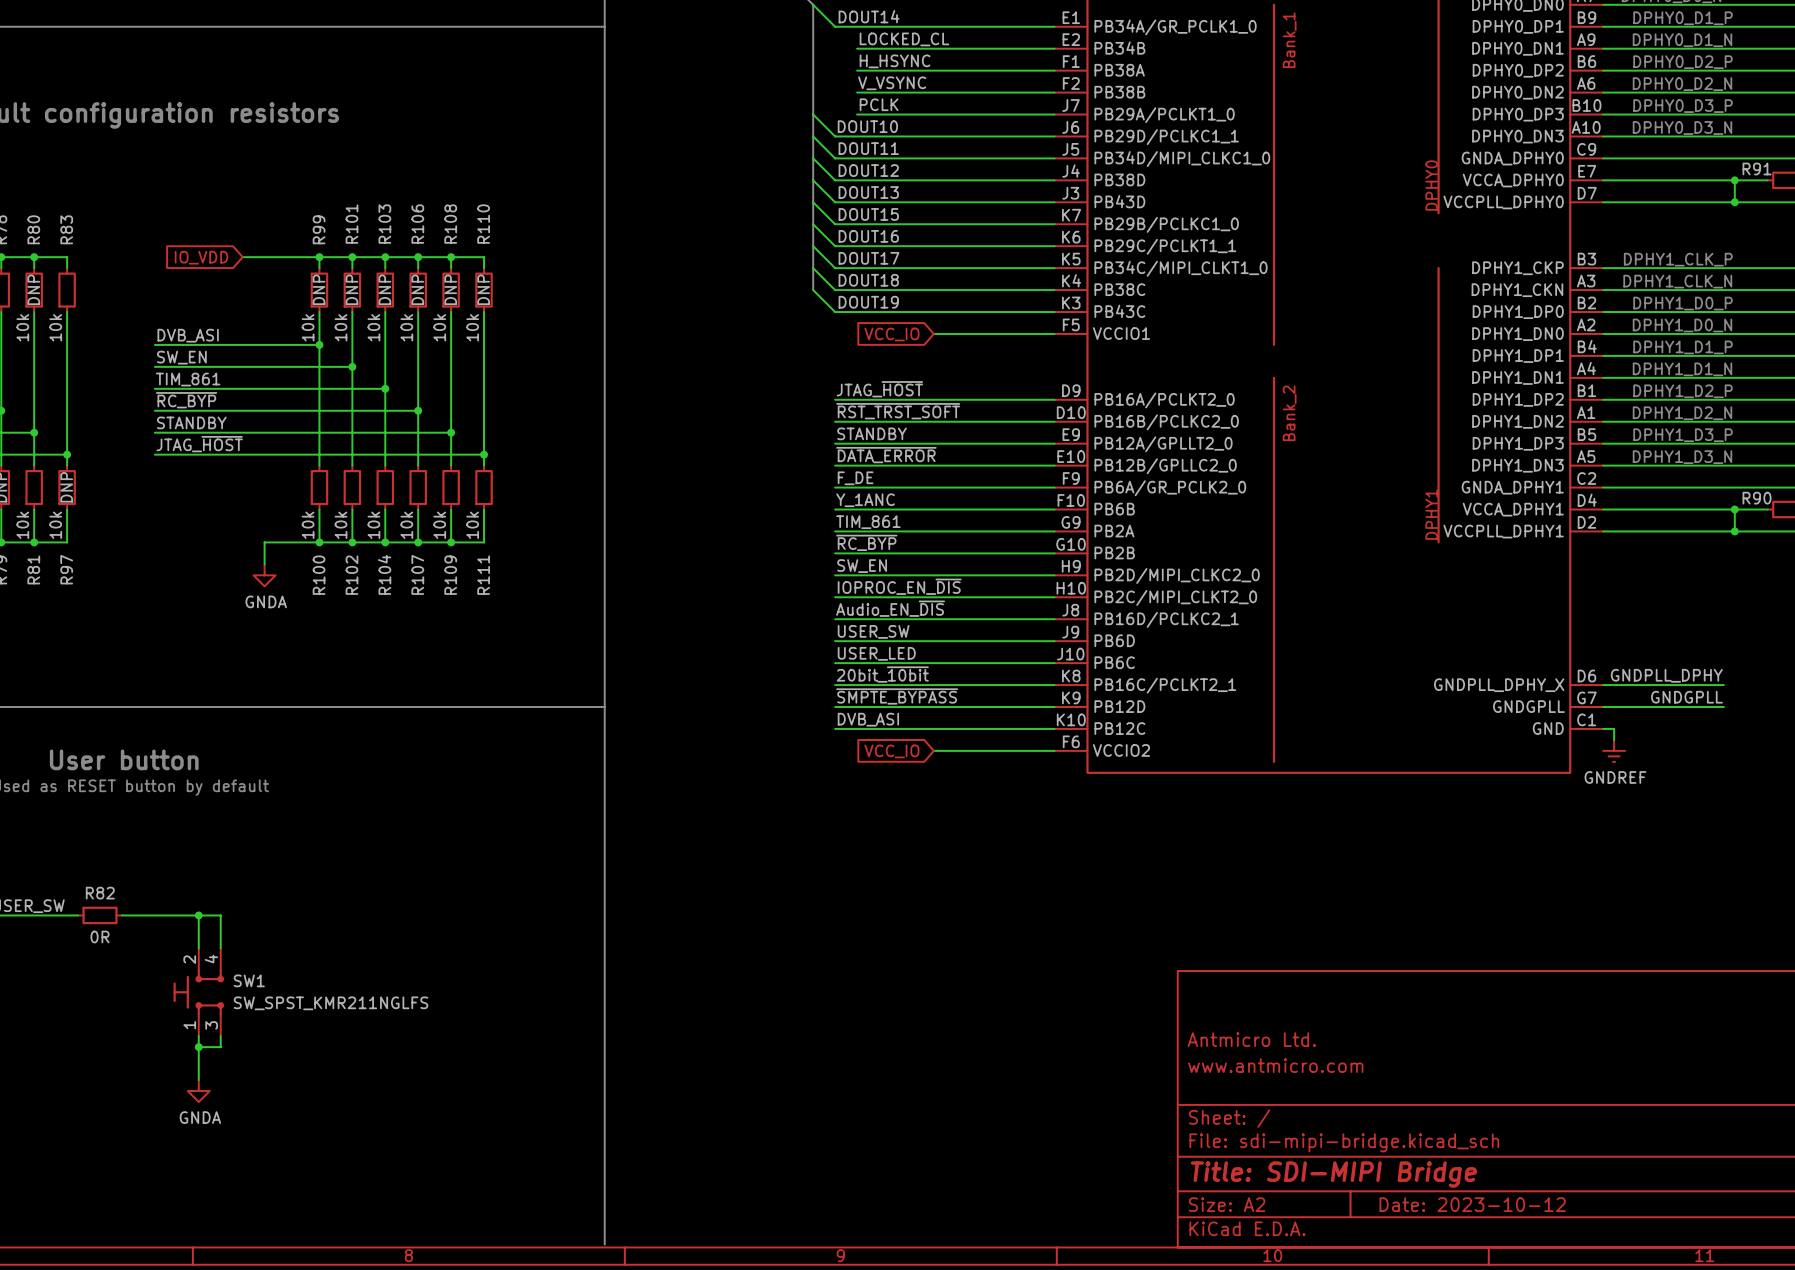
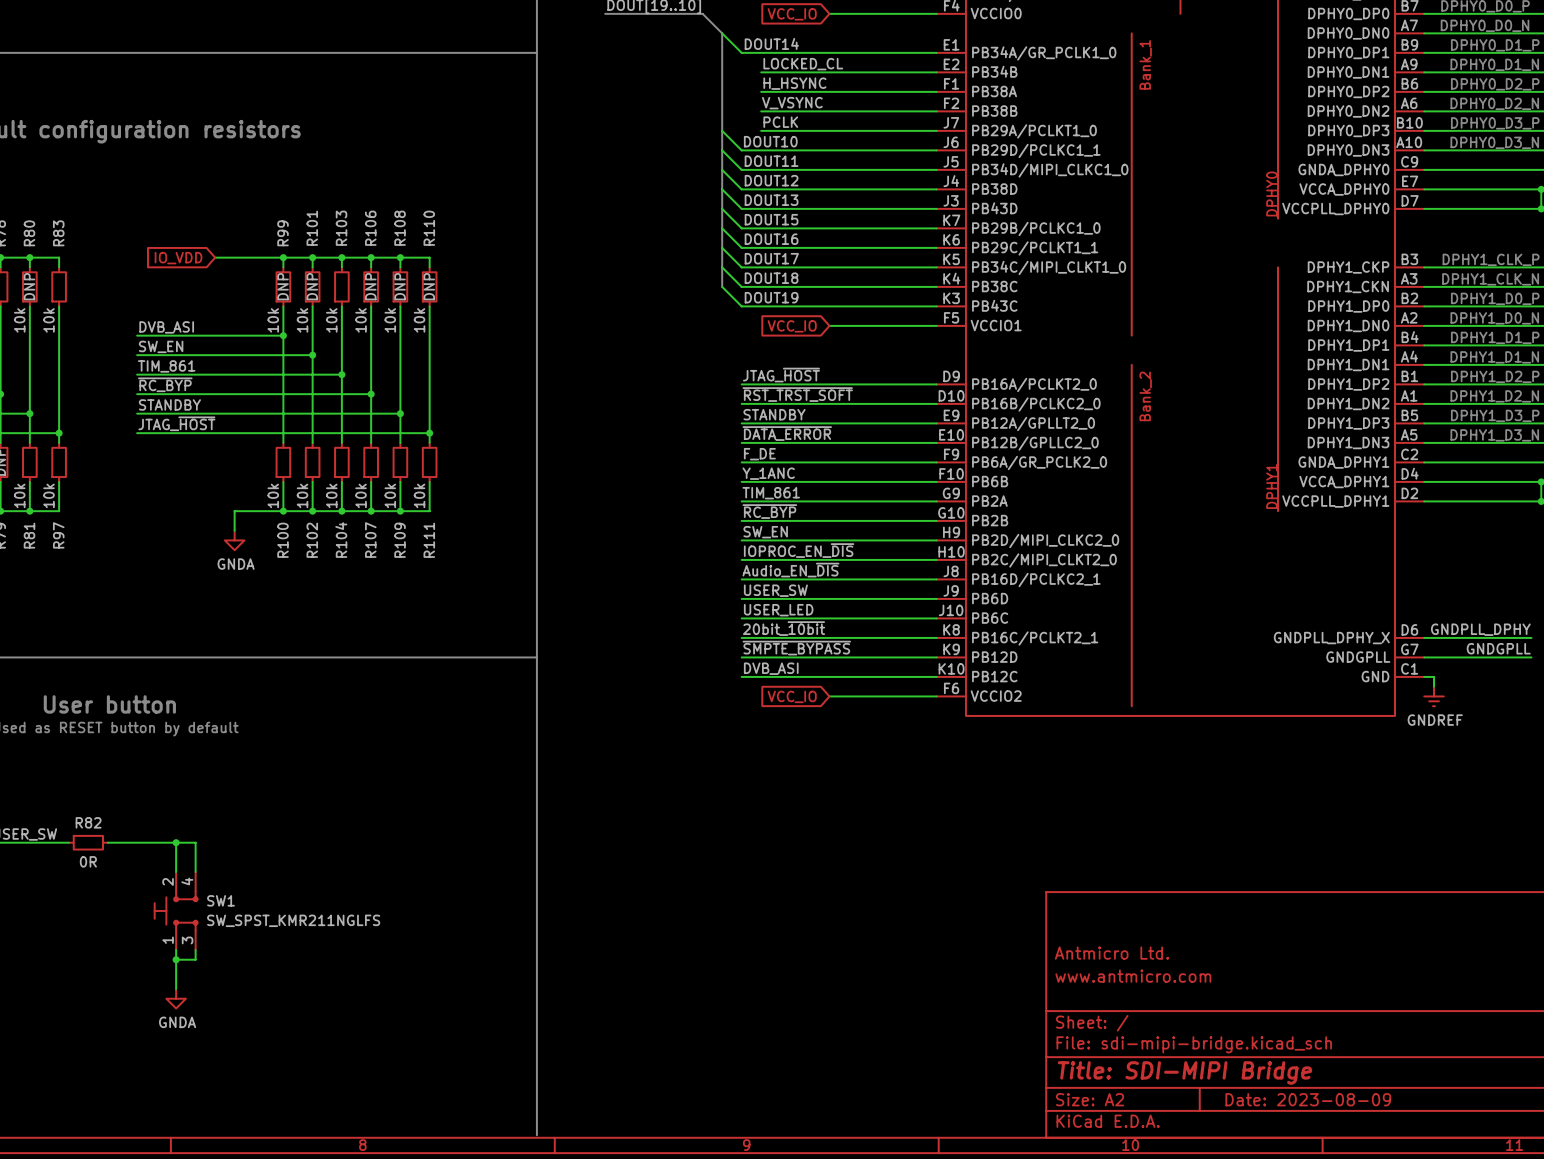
R103 text: DNP (384, 289) -> none
R97 text: DNP (66, 487) -> none
title block: Date: 2023-10-12 (1472, 1204) -> Date: 2023-08-09 (1308, 1099)

